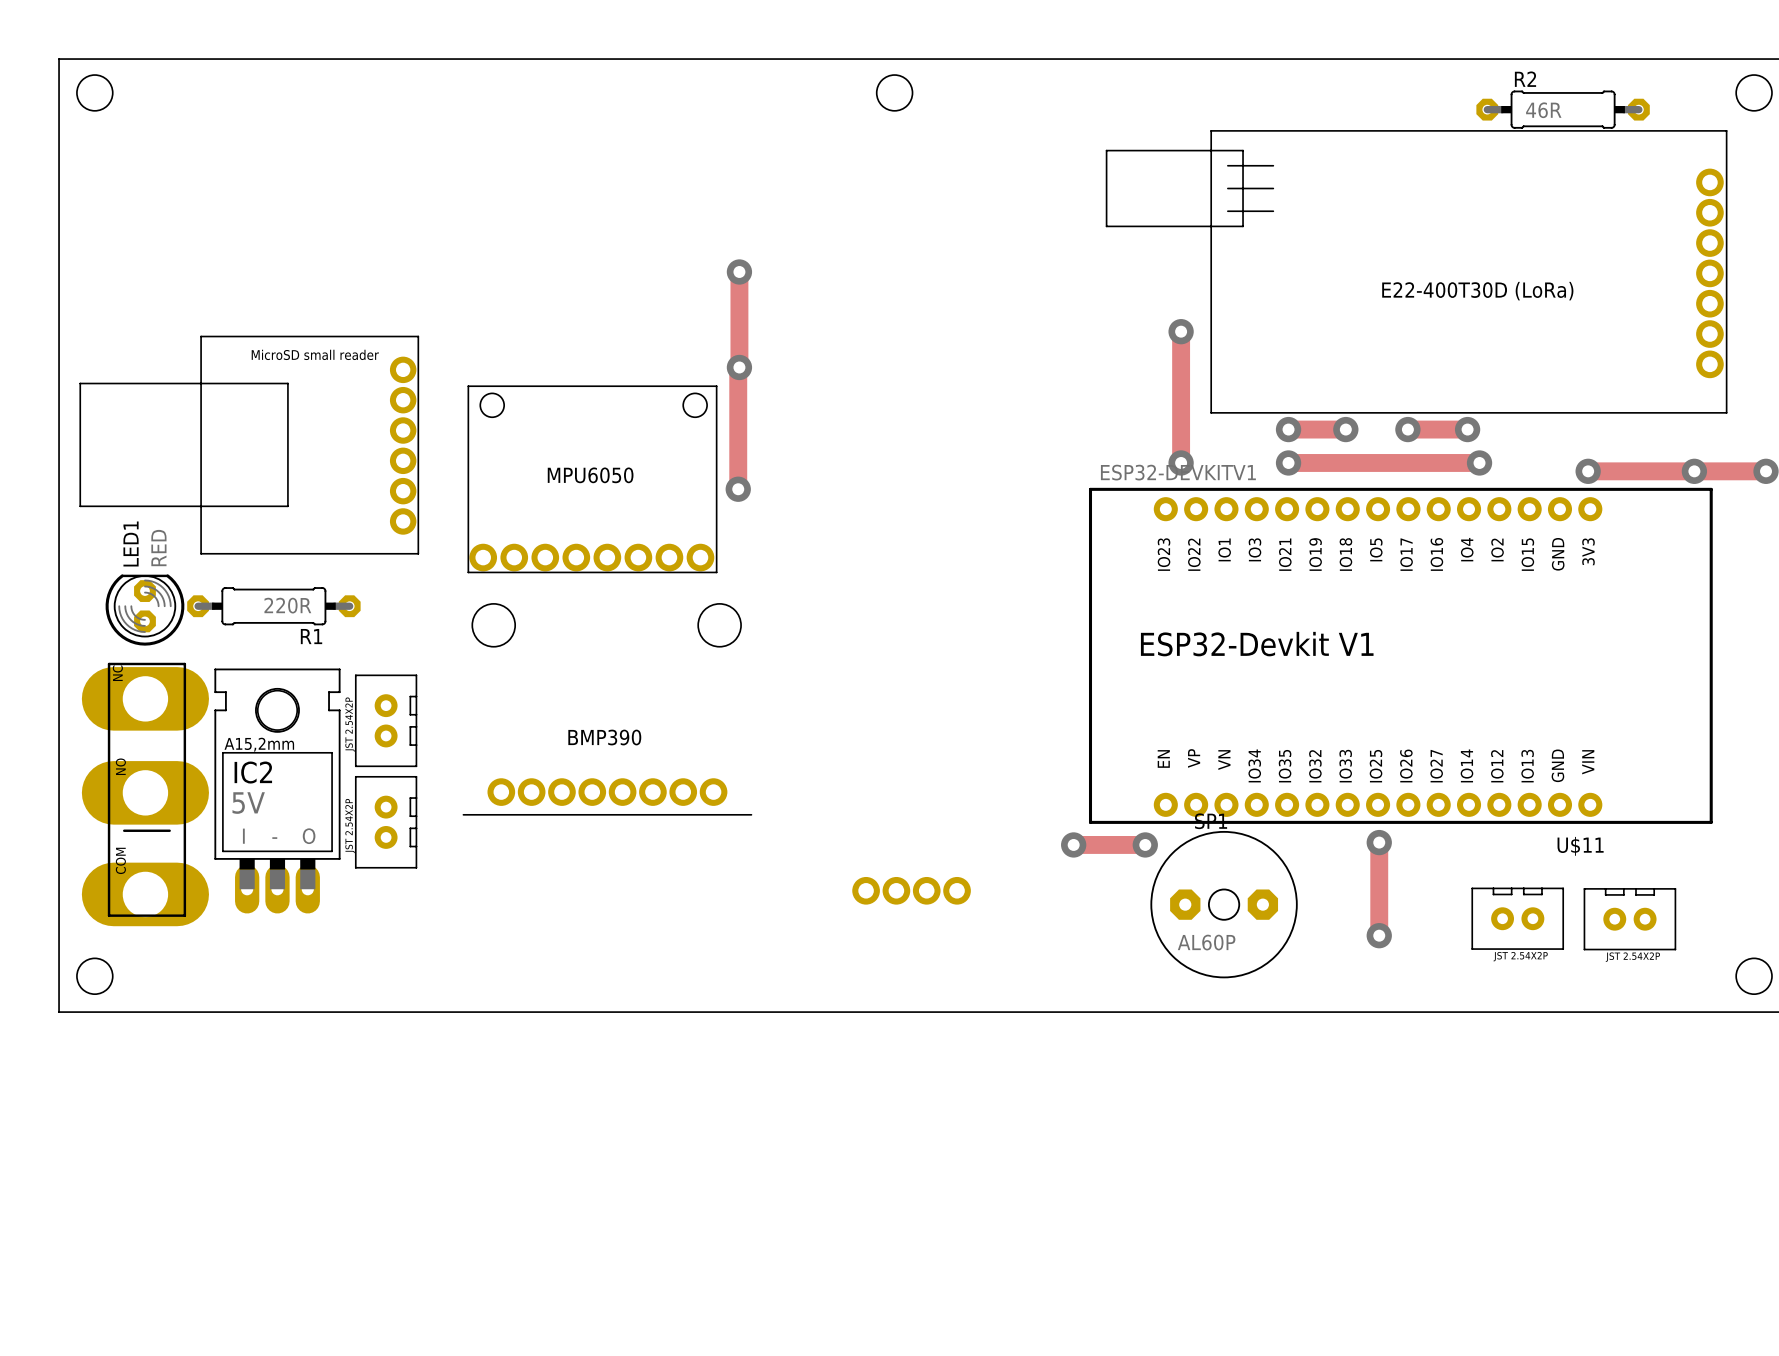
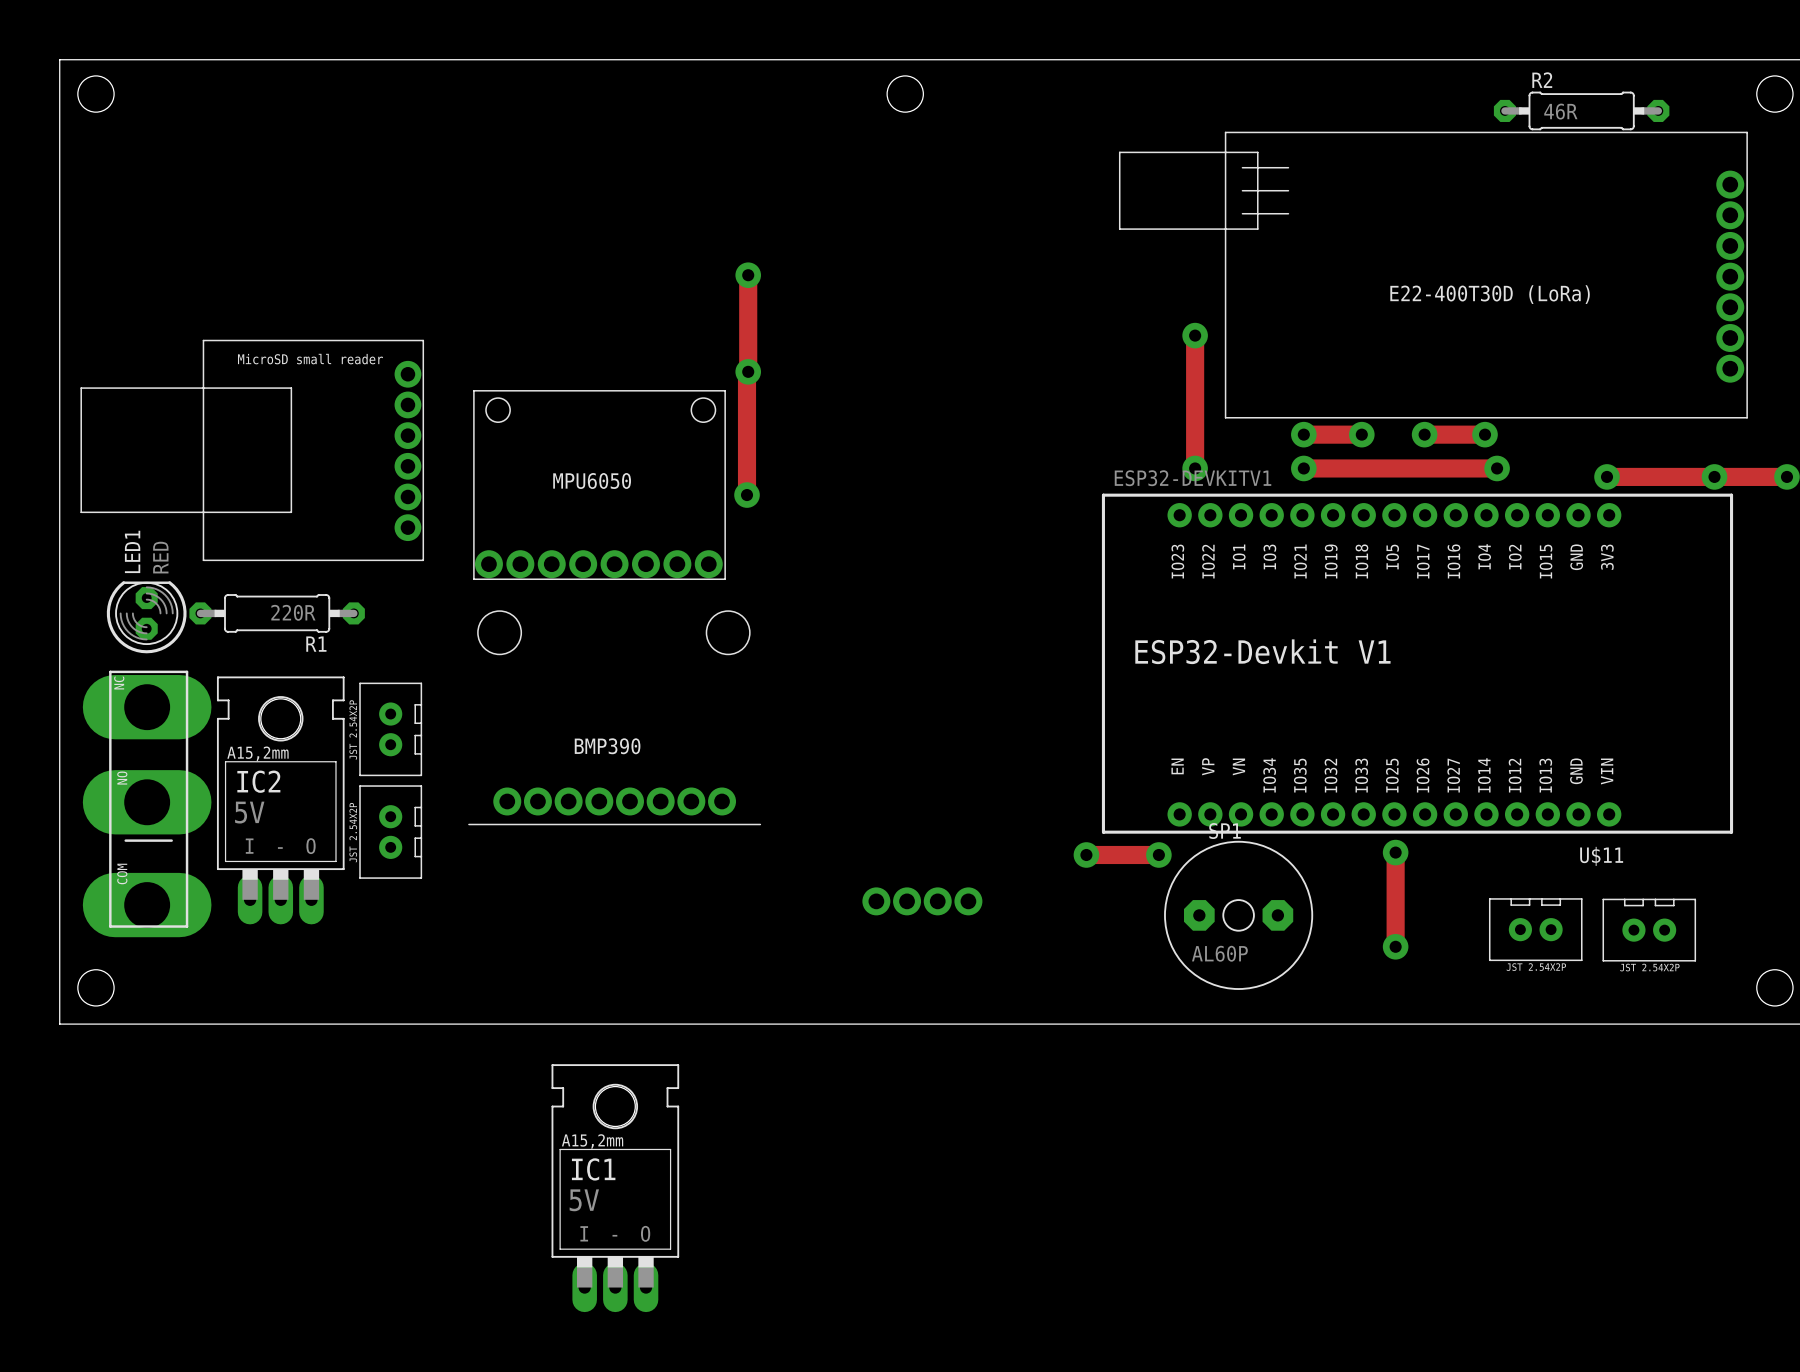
IC1: none -> 5V (615, 1188)

